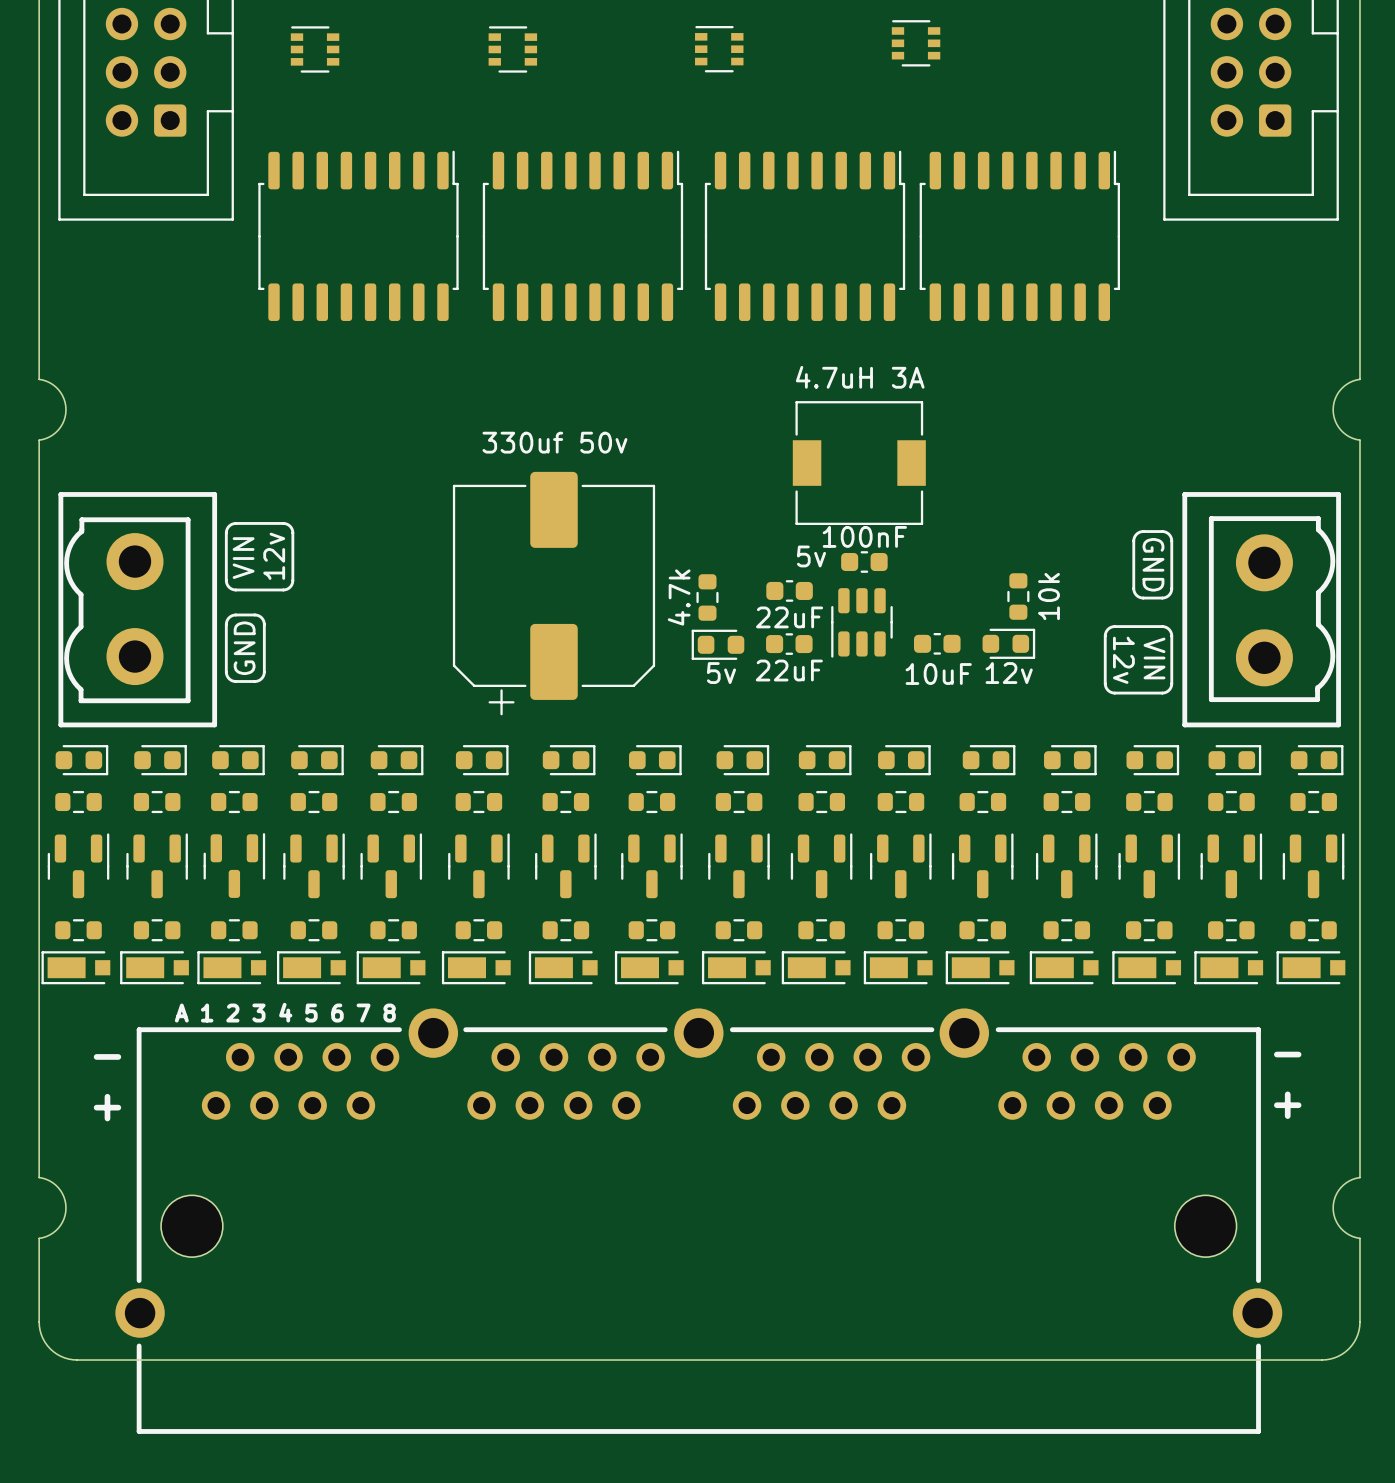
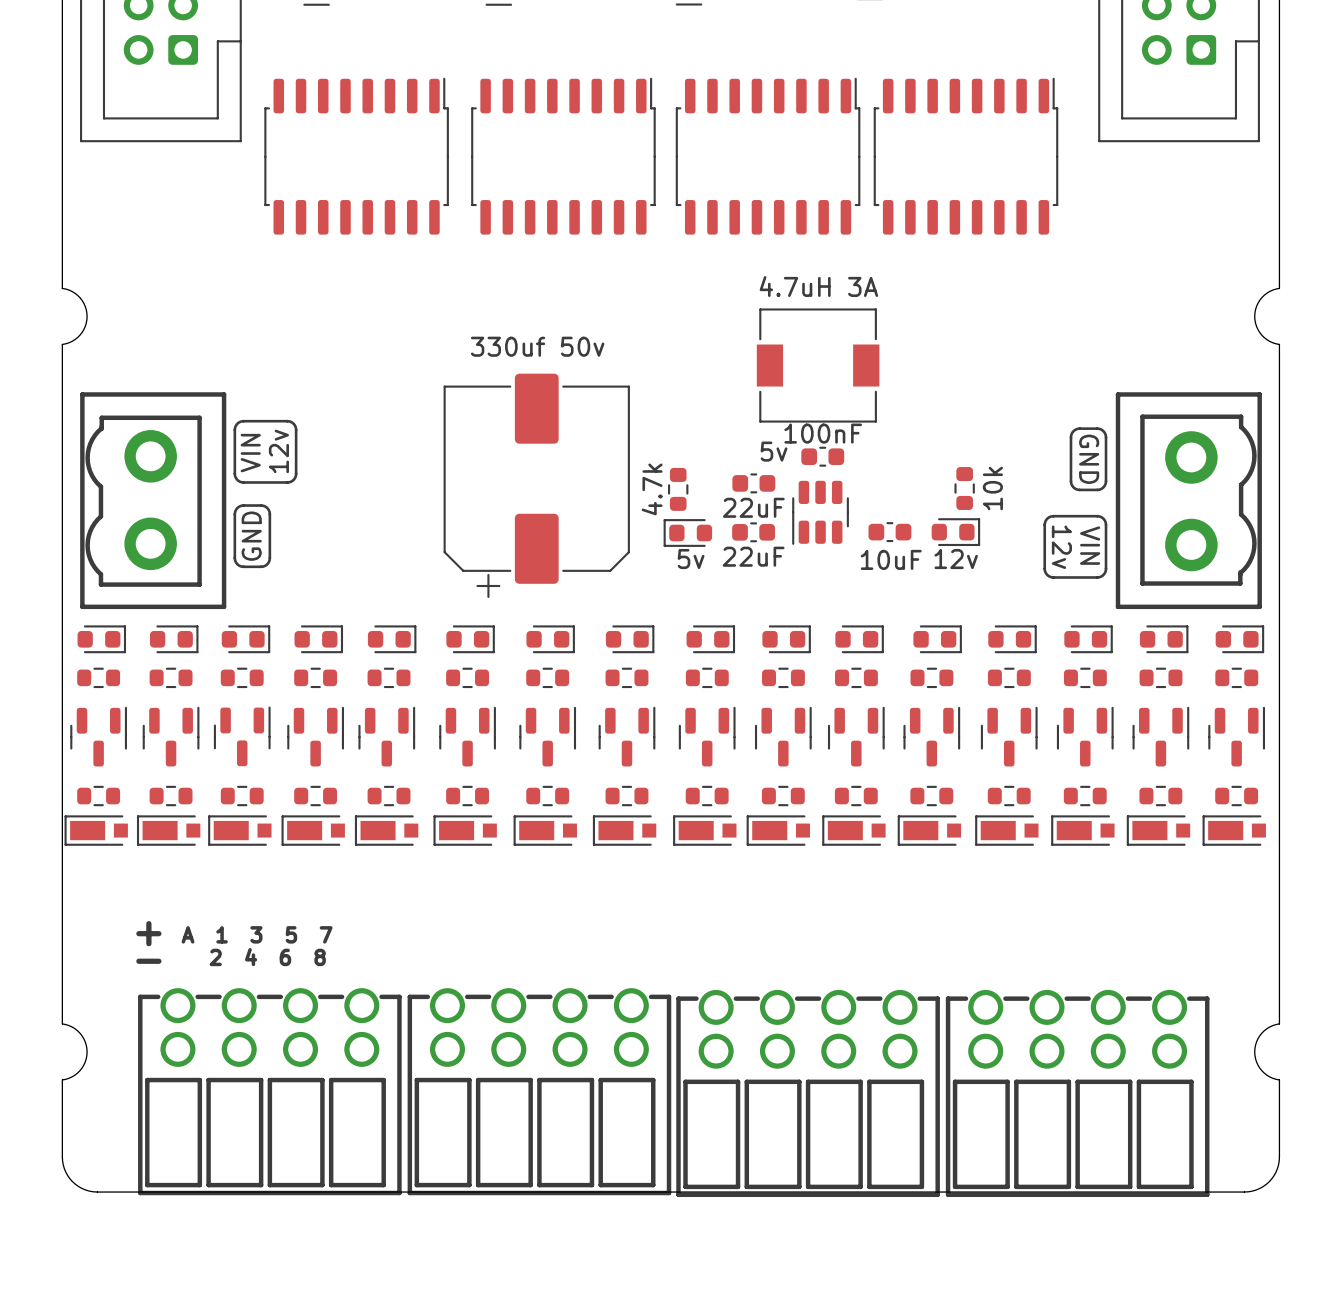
text: A 1 2 3 4 5 6 7 8 (285, 1012) -> none
text: - (1287, 1054) -> none
text position: - (107, 1056) -> - (148, 961)
text: none -> A 1 3 5 7 (257, 934)
text: none -> 2 4 6 8 (267, 957)
text: + (1287, 1105) -> none
text position: + (107, 1107) -> + (148, 933)
part: (698, 1221) -> none
part: none -> (269, 1091)
part: none -> (539, 1091)
part: none -> (808, 1093)
part: none -> (1077, 1093)

